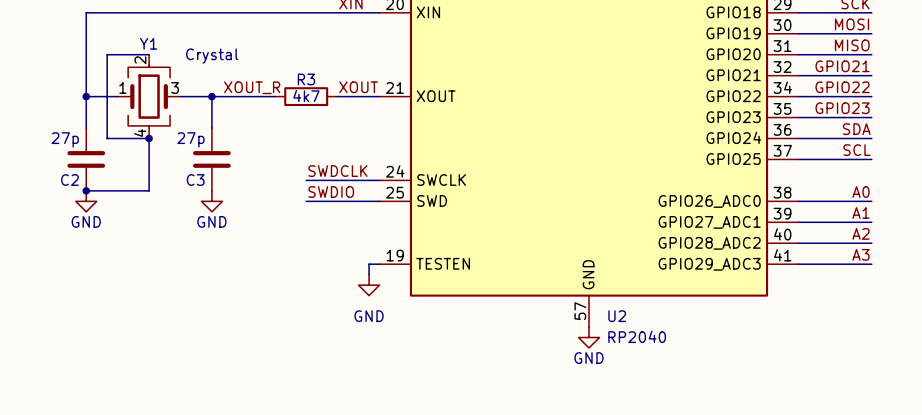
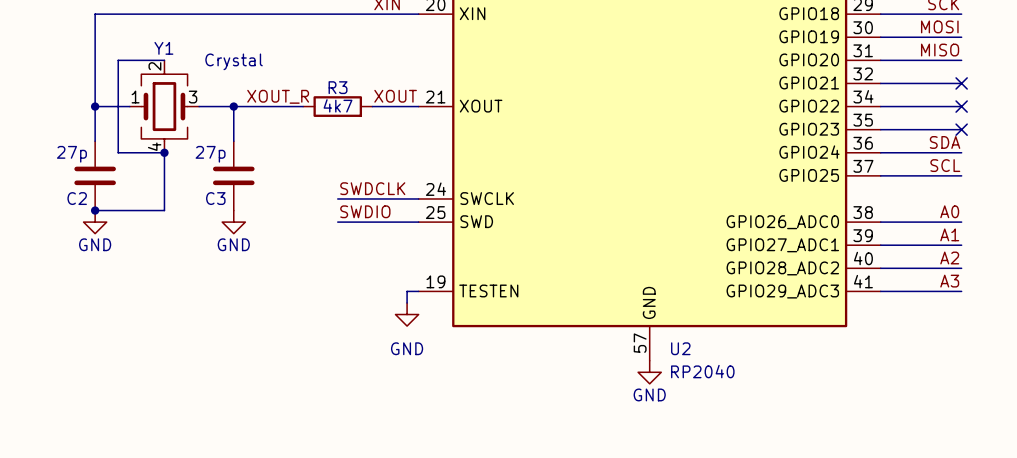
label: GPIO21 (842, 66) -> none
no-connect mark: none -> (961, 83)
label: GPIO22 (842, 87) -> none
no-connect mark: none -> (961, 106)
label: GPIO23 (842, 108) -> none
no-connect mark: none -> (961, 129)

